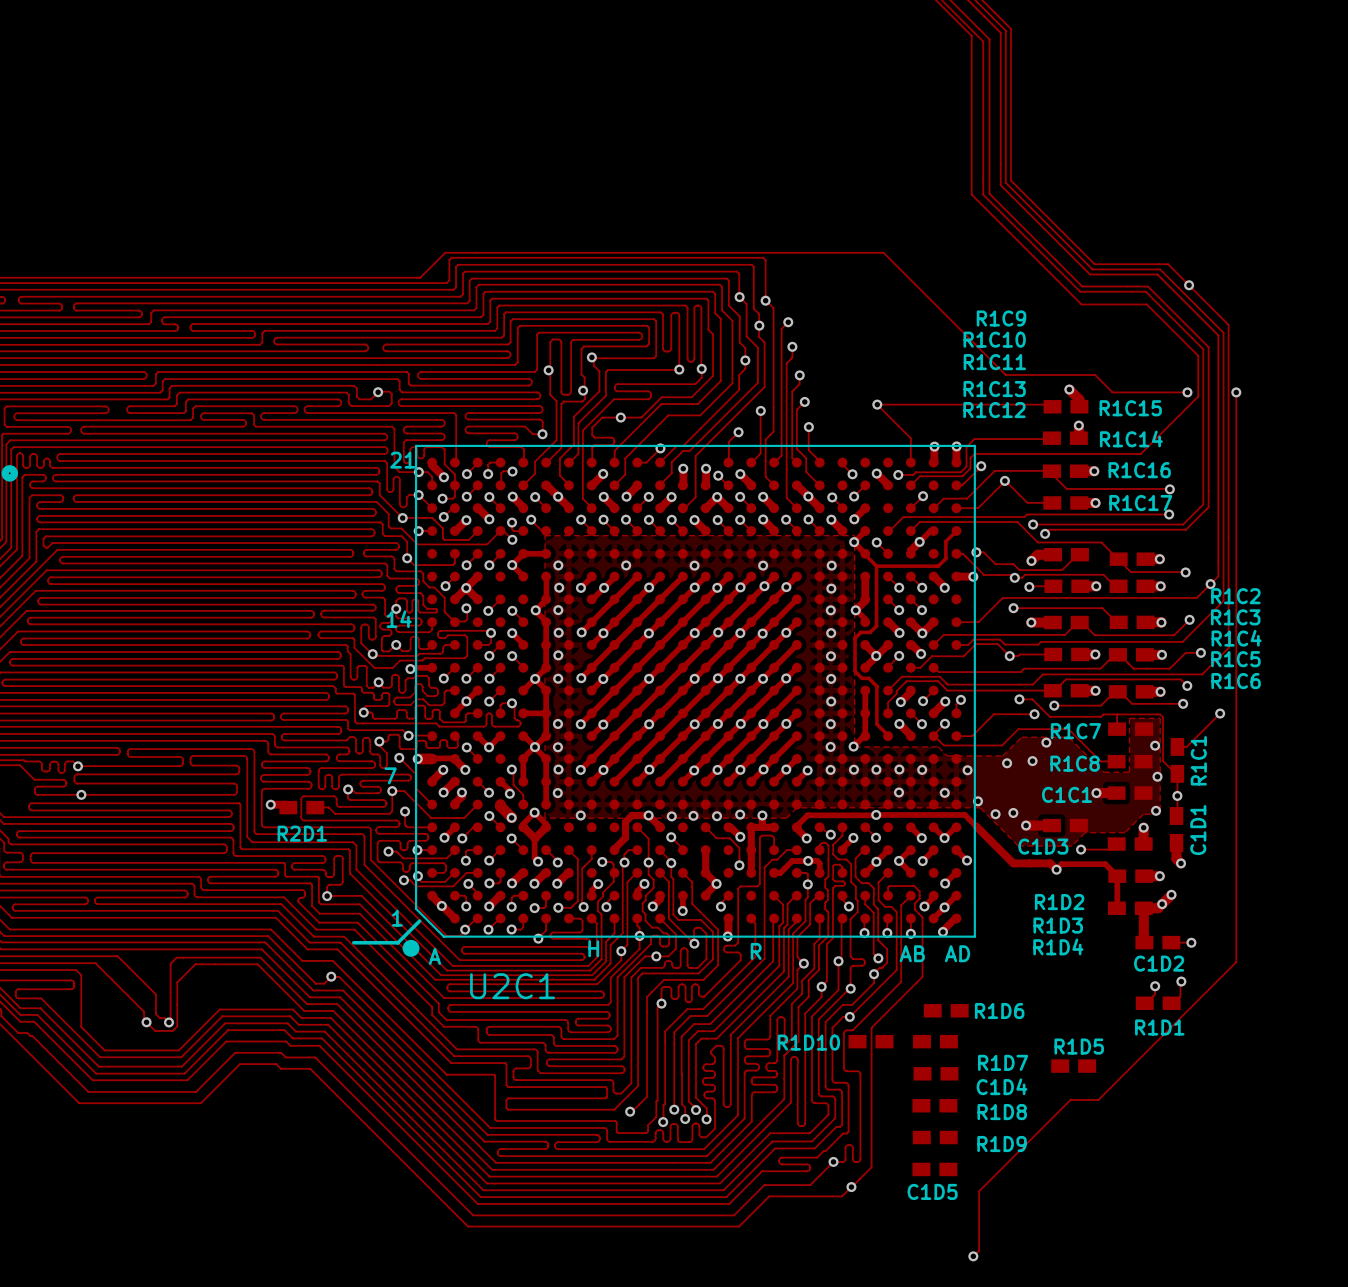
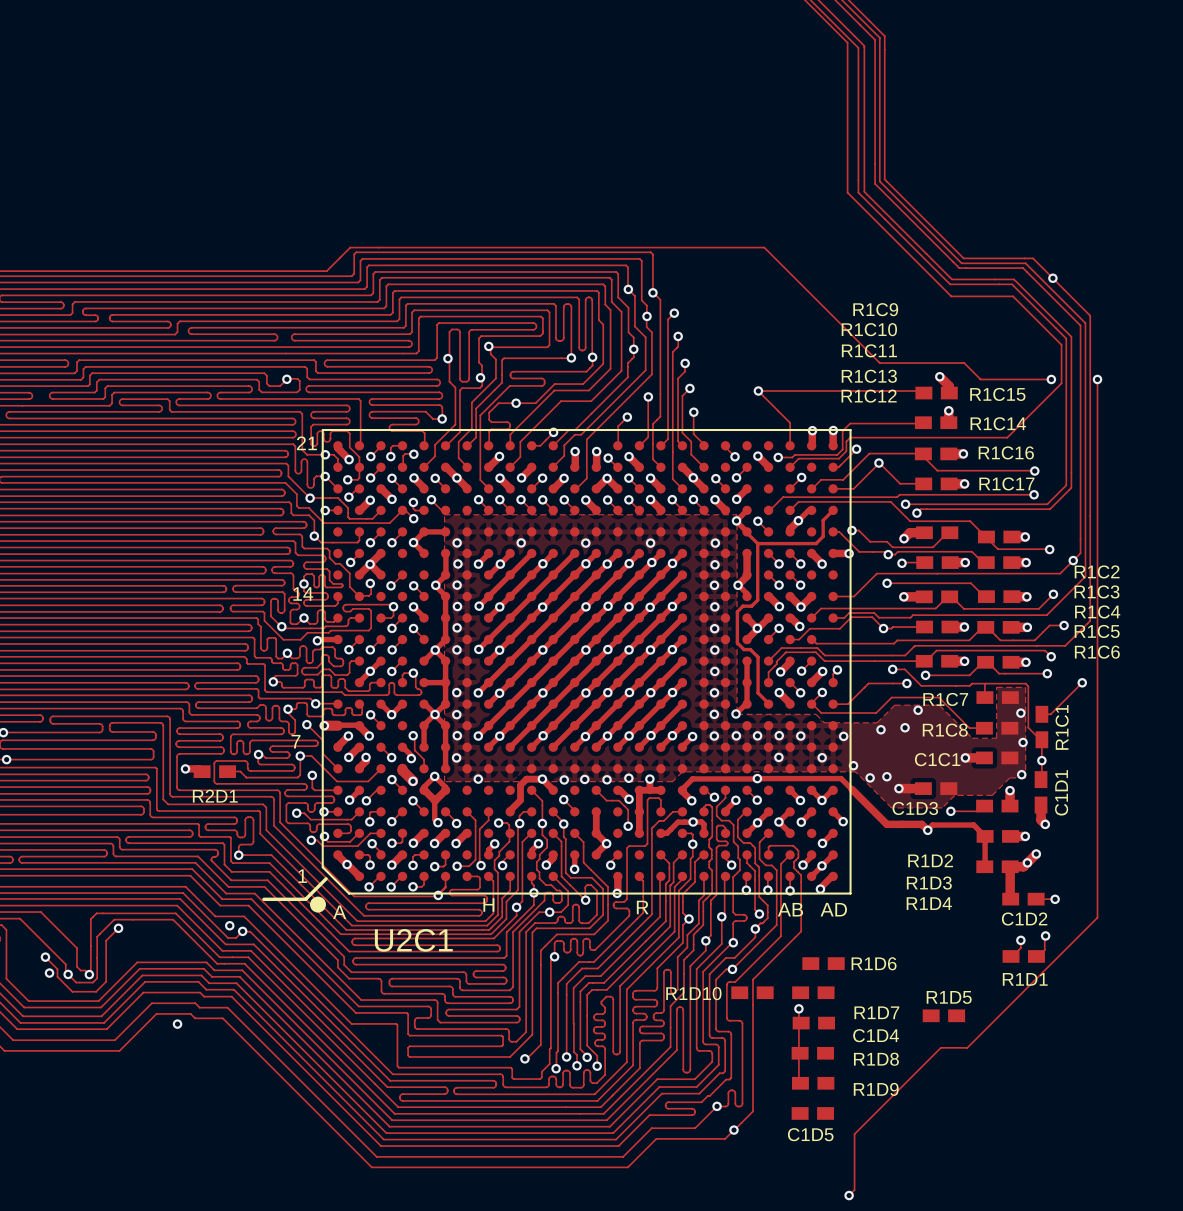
track: (370, 860) (447, 936) (459, 936) (465, 930) -> (280, 821) (354, 896) (435, 896) (445, 886)
via: none -> (229, 925)
track: none -> (118, 928) (106, 940) (106, 981) (96, 991) (72, 991) (57, 976) (57, 969) (45, 957)
via: none -> (118, 928)
via: none -> (45, 957)
via: none -> (49, 973)
track: none -> (798, 1008) (798, 1083)
via: none -> (798, 1008)
via: none -> (177, 1024)

